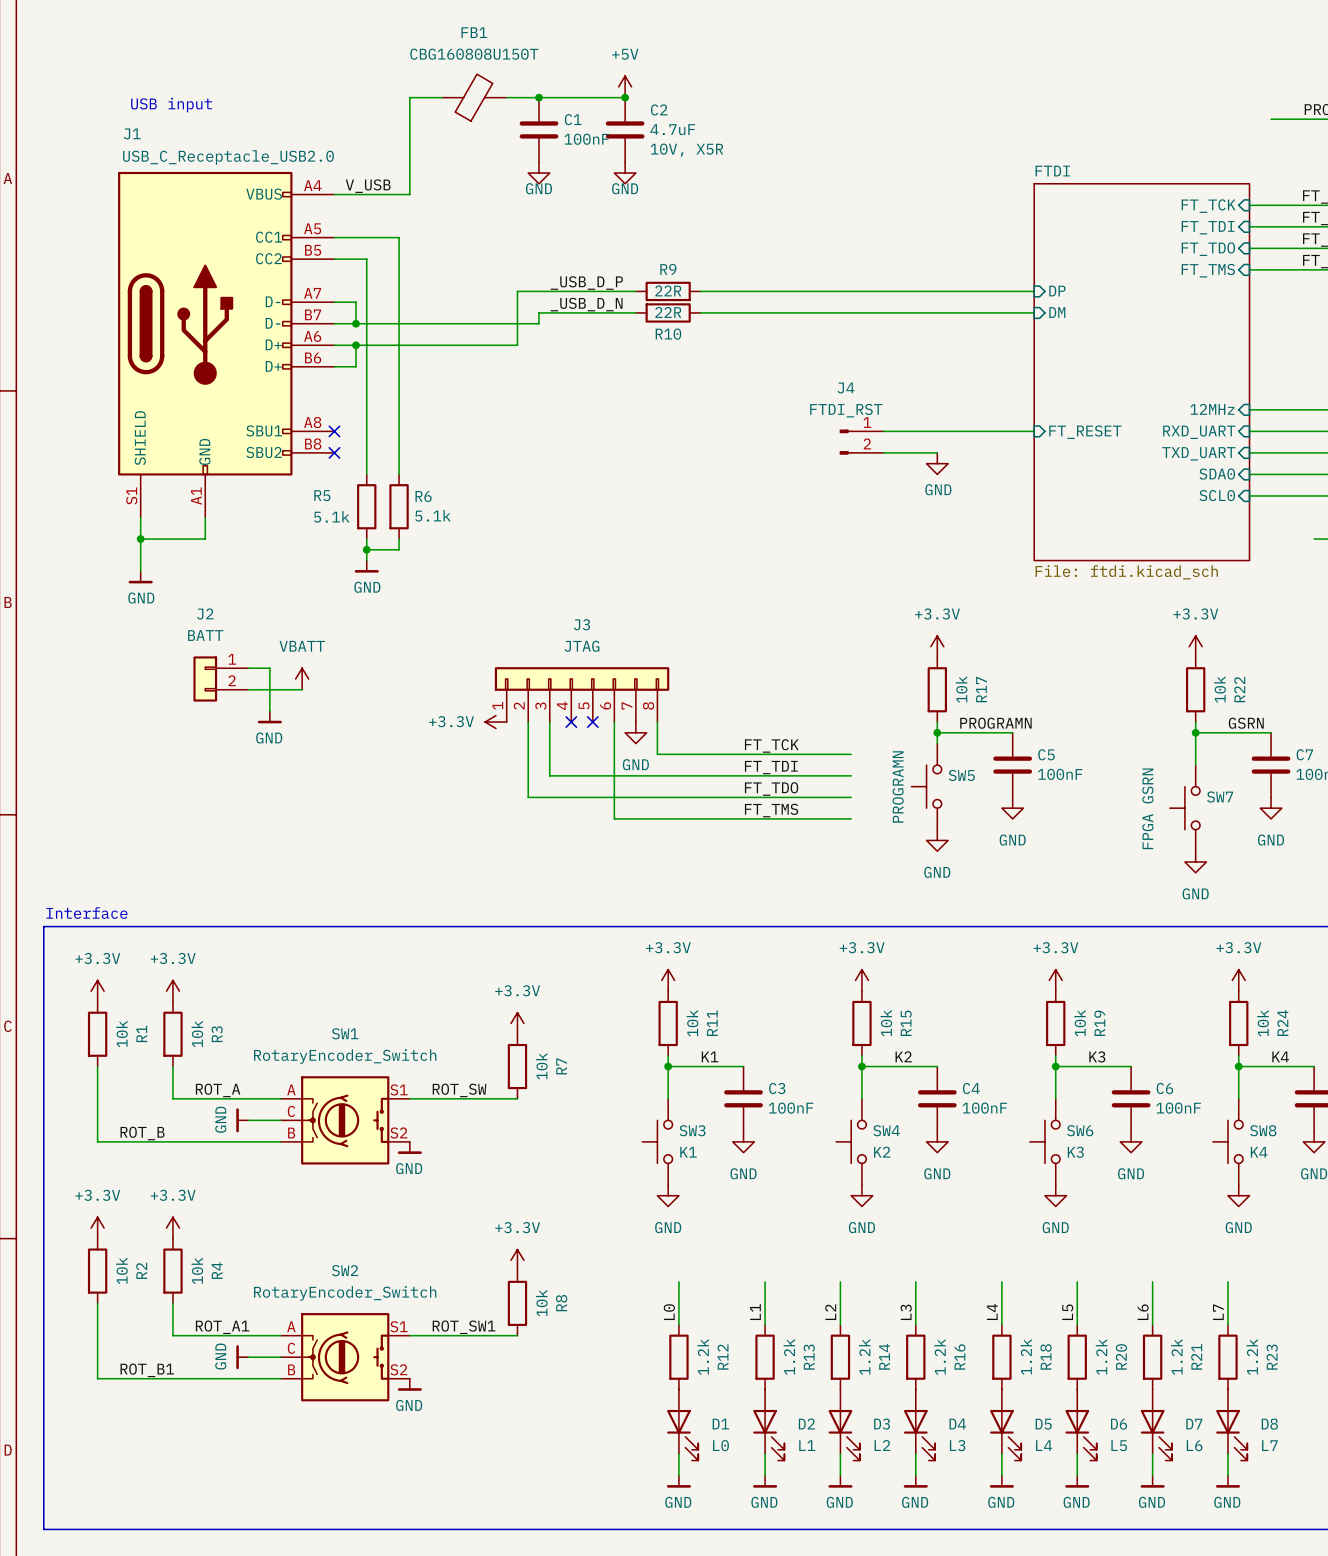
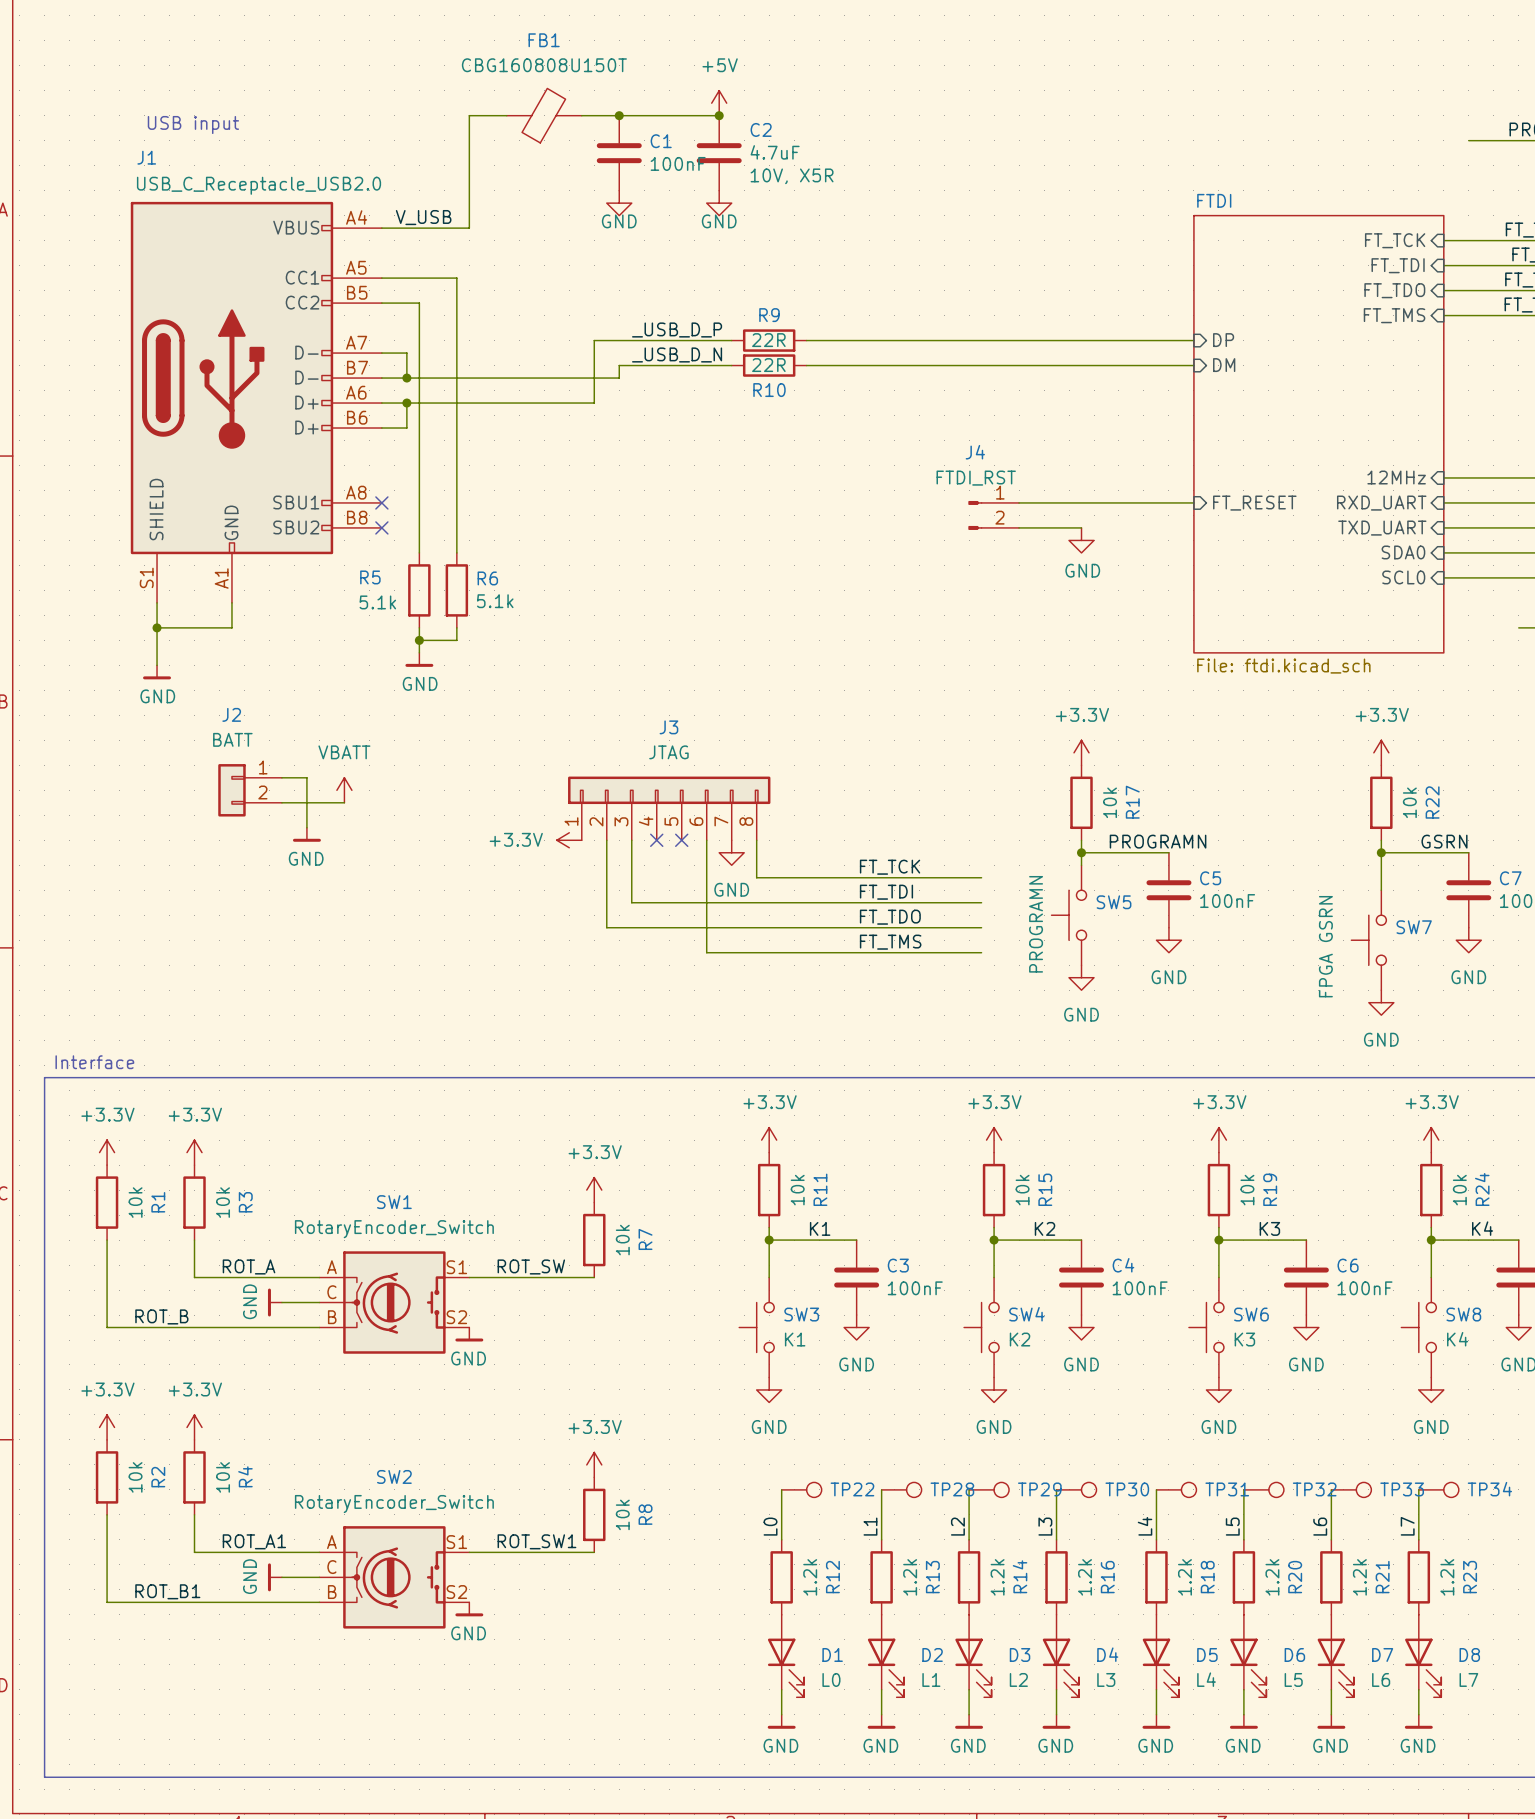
TP22: none -> (801, 1489)
TP28: none -> (901, 1489)
TP29: none -> (989, 1489)
TP30: none -> (1076, 1489)
TP31: none -> (1176, 1489)
TP32: none -> (1263, 1489)
TP33: none -> (1351, 1489)
TP34: none -> (1438, 1489)

